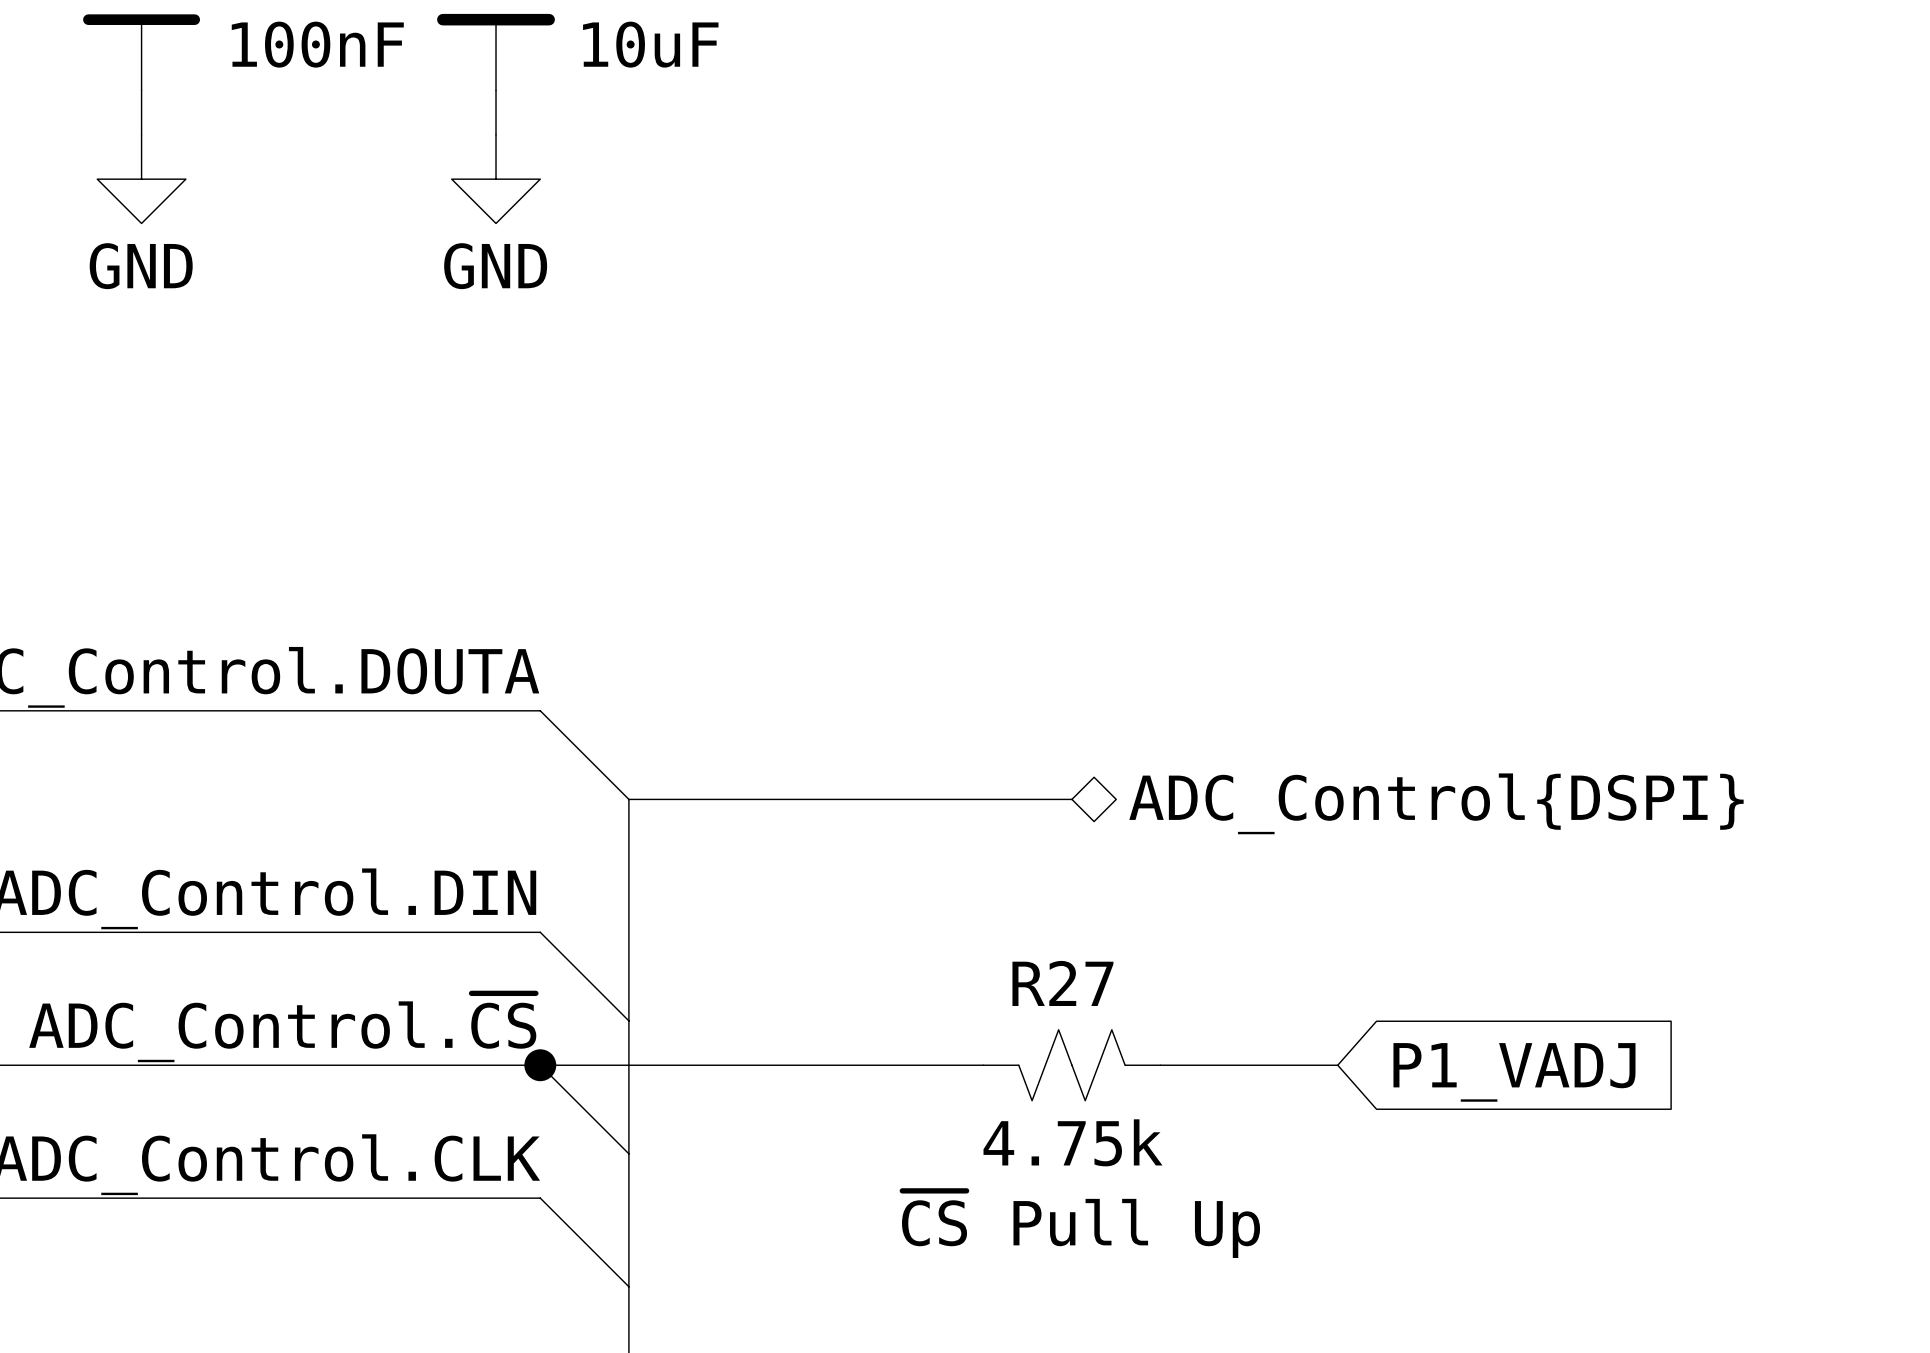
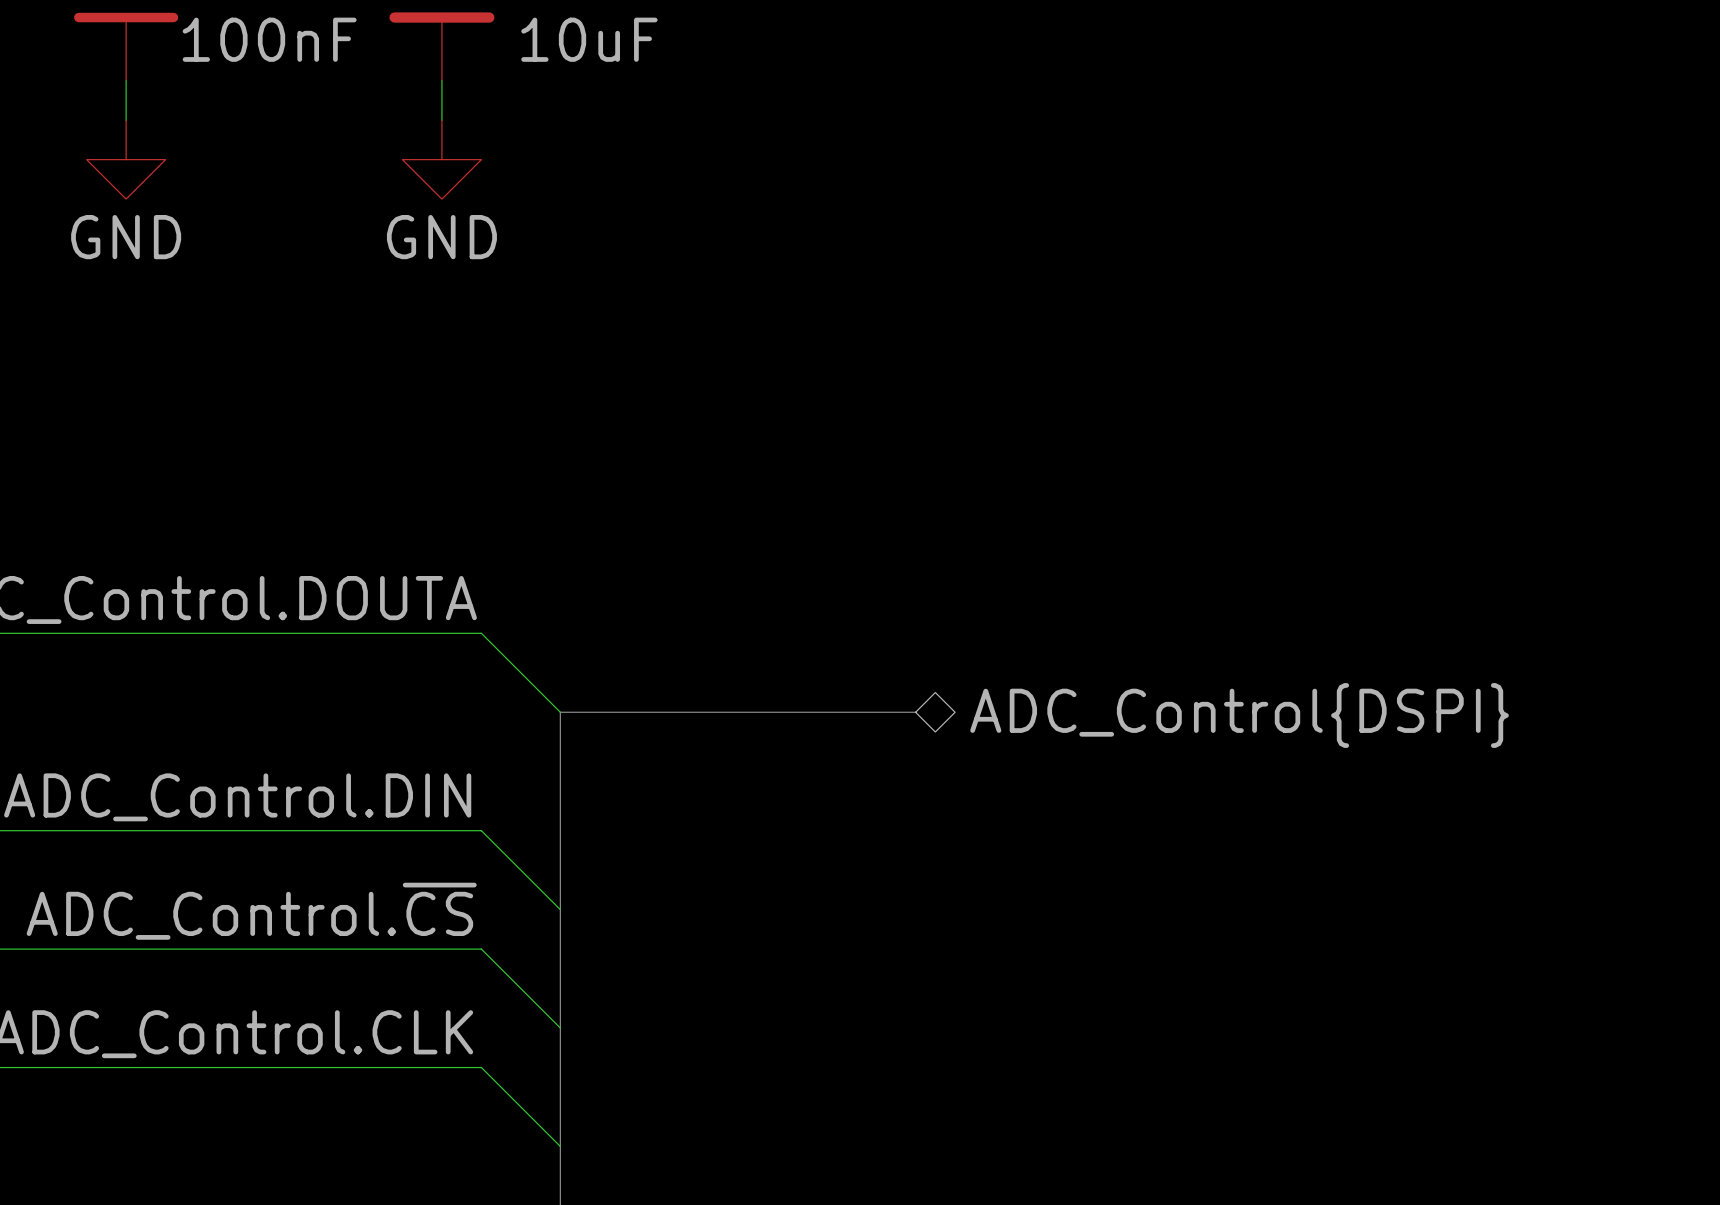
bus: (1027, 799) (1071, 799) -> none
hierarchical label position: ADC_Control{DSPI} (1436, 803) -> ADC_Control{DSPI} (1239, 715)
wire: (540, 1065) (983, 1065) -> none
junction: (540, 1065) -> none
R27: 4.75k (1071, 1065) -> none
wire: (1160, 1065) (1337, 1065) -> none
global label: P1_VADJ (1514, 1072) -> none
text: ~{CS} Pull Up (1081, 1224) -> none

